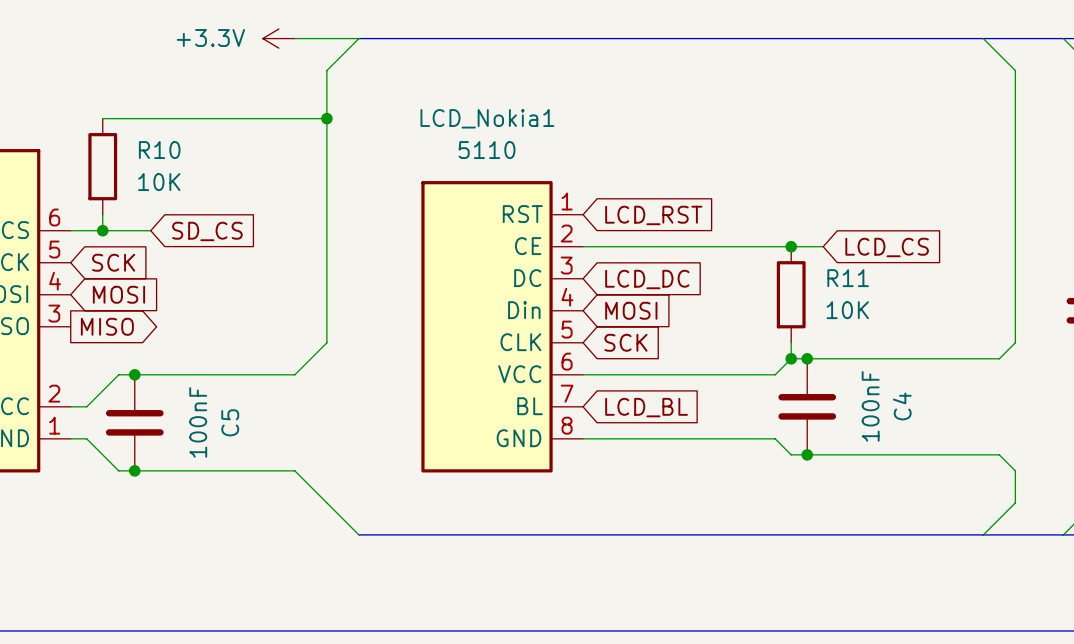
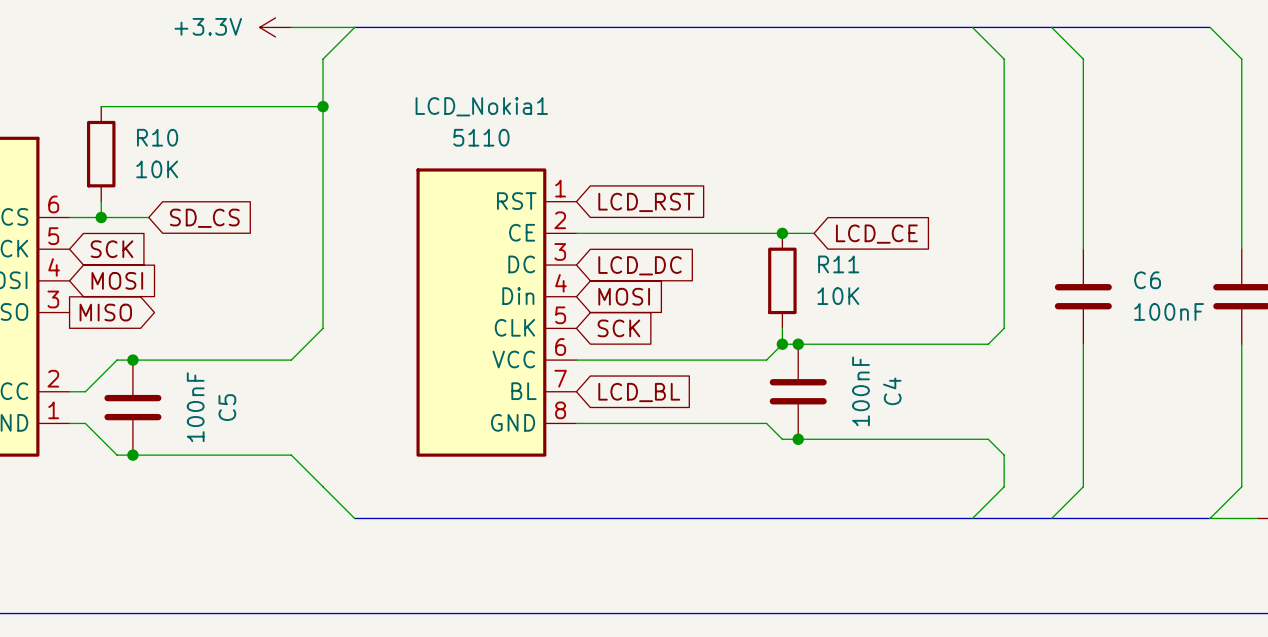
global label: LCD_CS (887, 247) -> LCD_CE (876, 234)

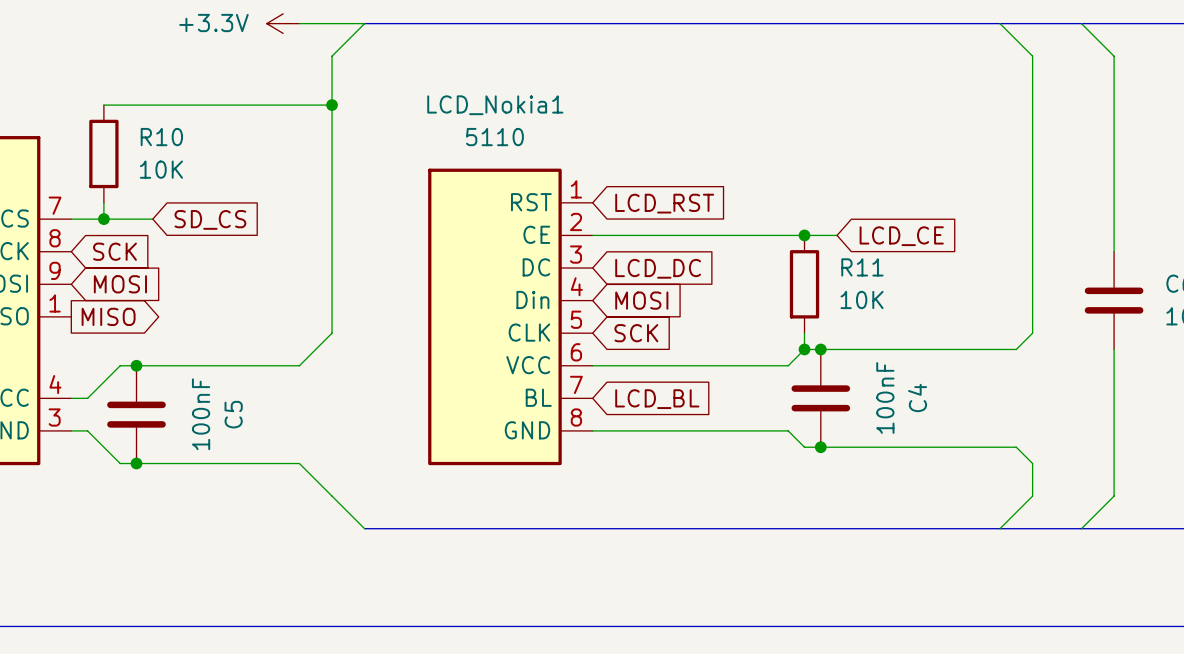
part pin number: 6 (53, 204) -> 7 (55, 205)
part pin number: 5 (53, 236) -> 8 (55, 238)
part pin number: 4 (54, 267) -> 9 (55, 270)
part pin number: 3 (53, 299) -> 1 (55, 303)
part pin number: 2 (53, 378) -> 4 (55, 384)
part pin number: 1 (53, 410) -> 3 (54, 417)

